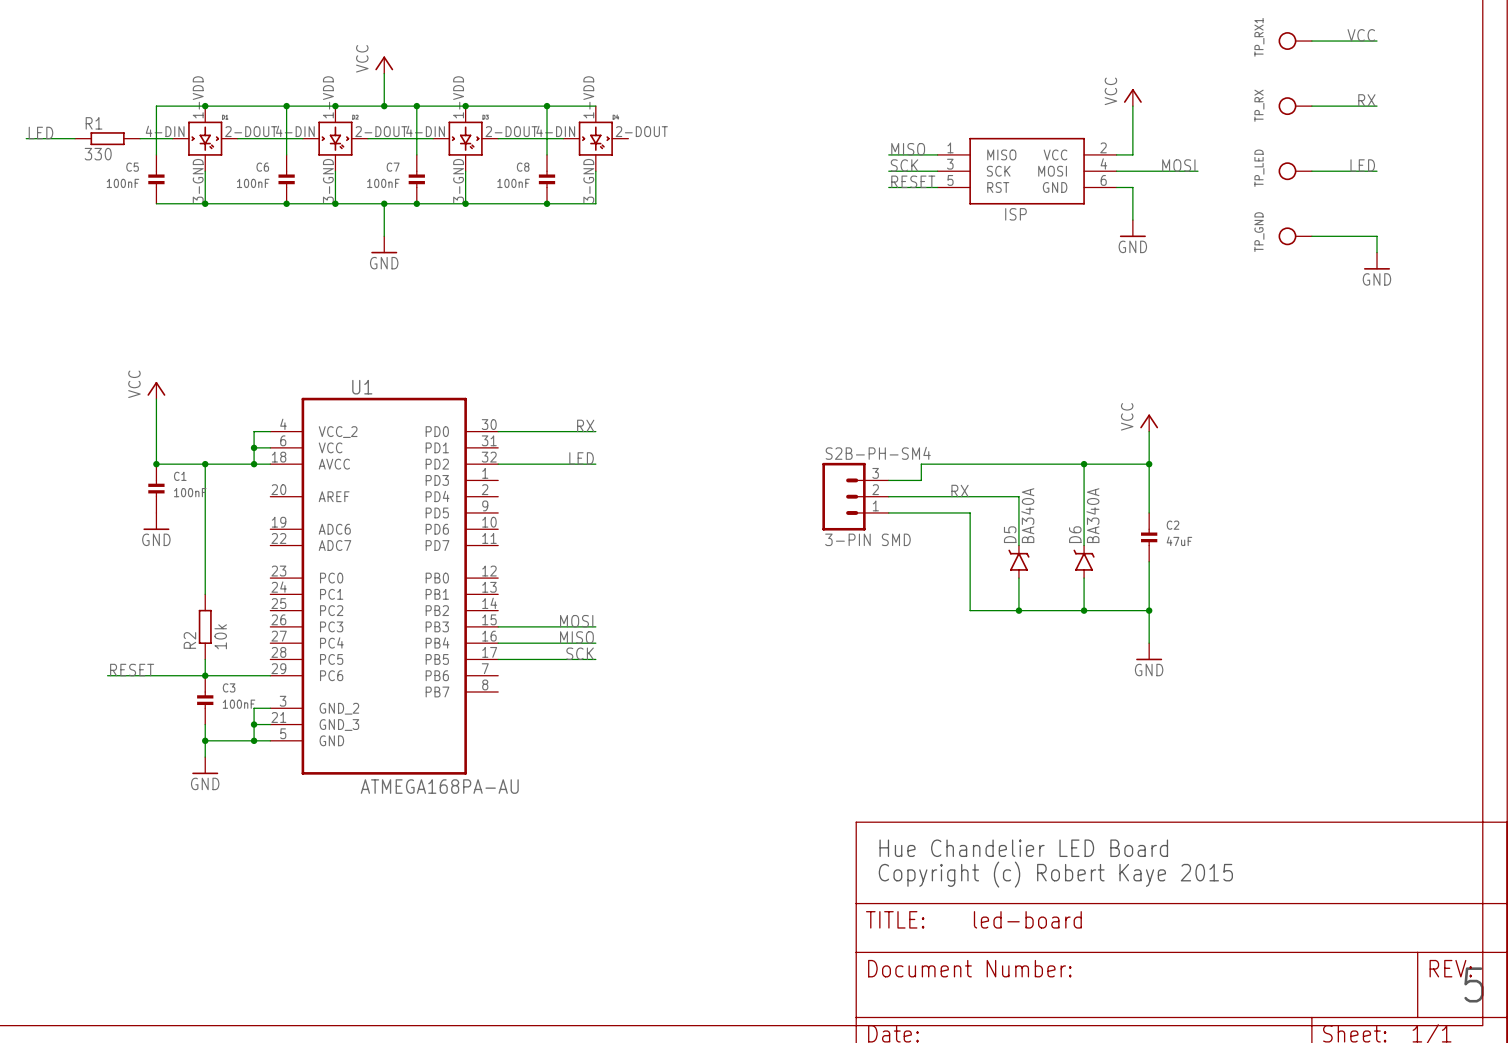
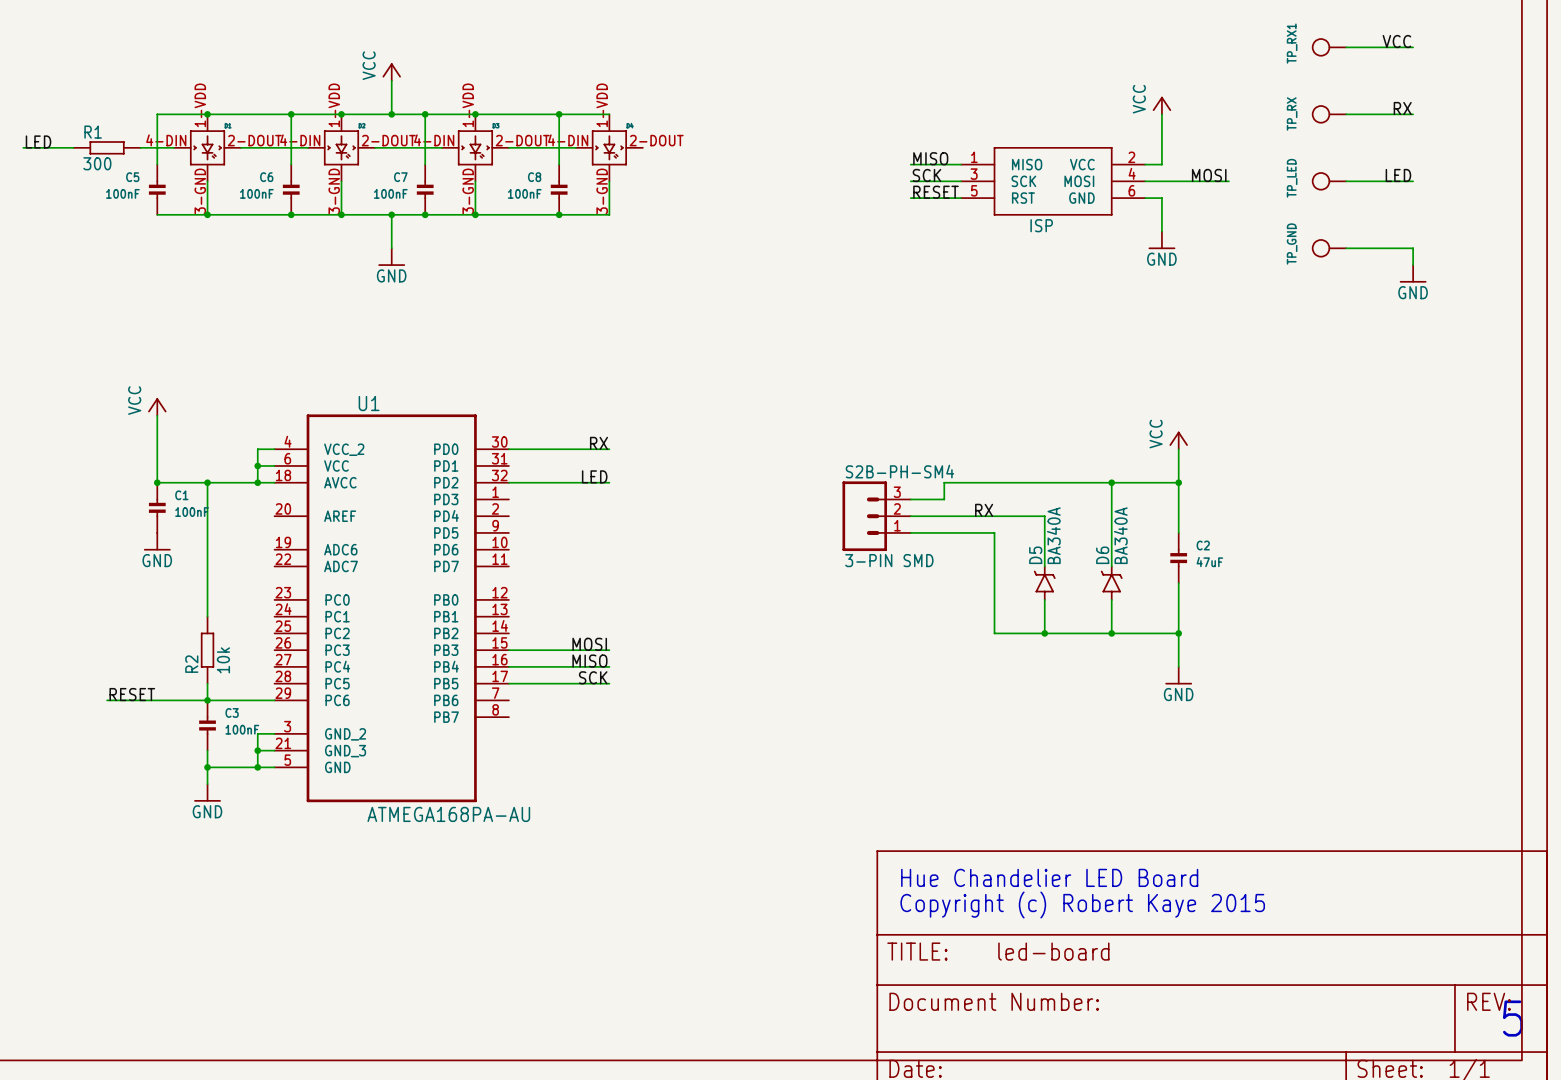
R1 value: 330 (98, 154) -> 300 (97, 163)

